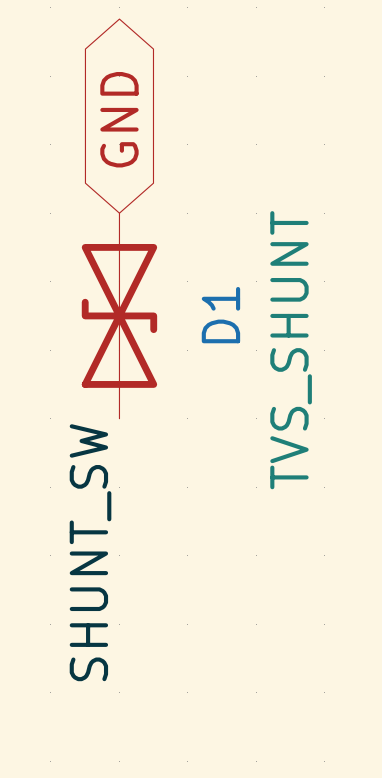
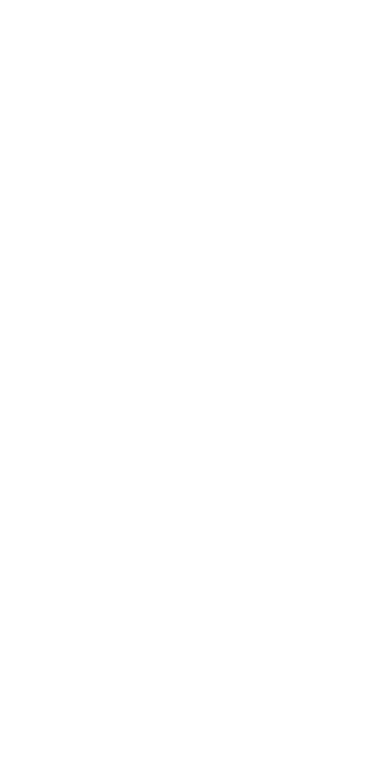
global label: GND (119, 119) -> none
D1: TVS_SHUNT (119, 315) -> none
label: SHUNT_SW (90, 552) -> none

